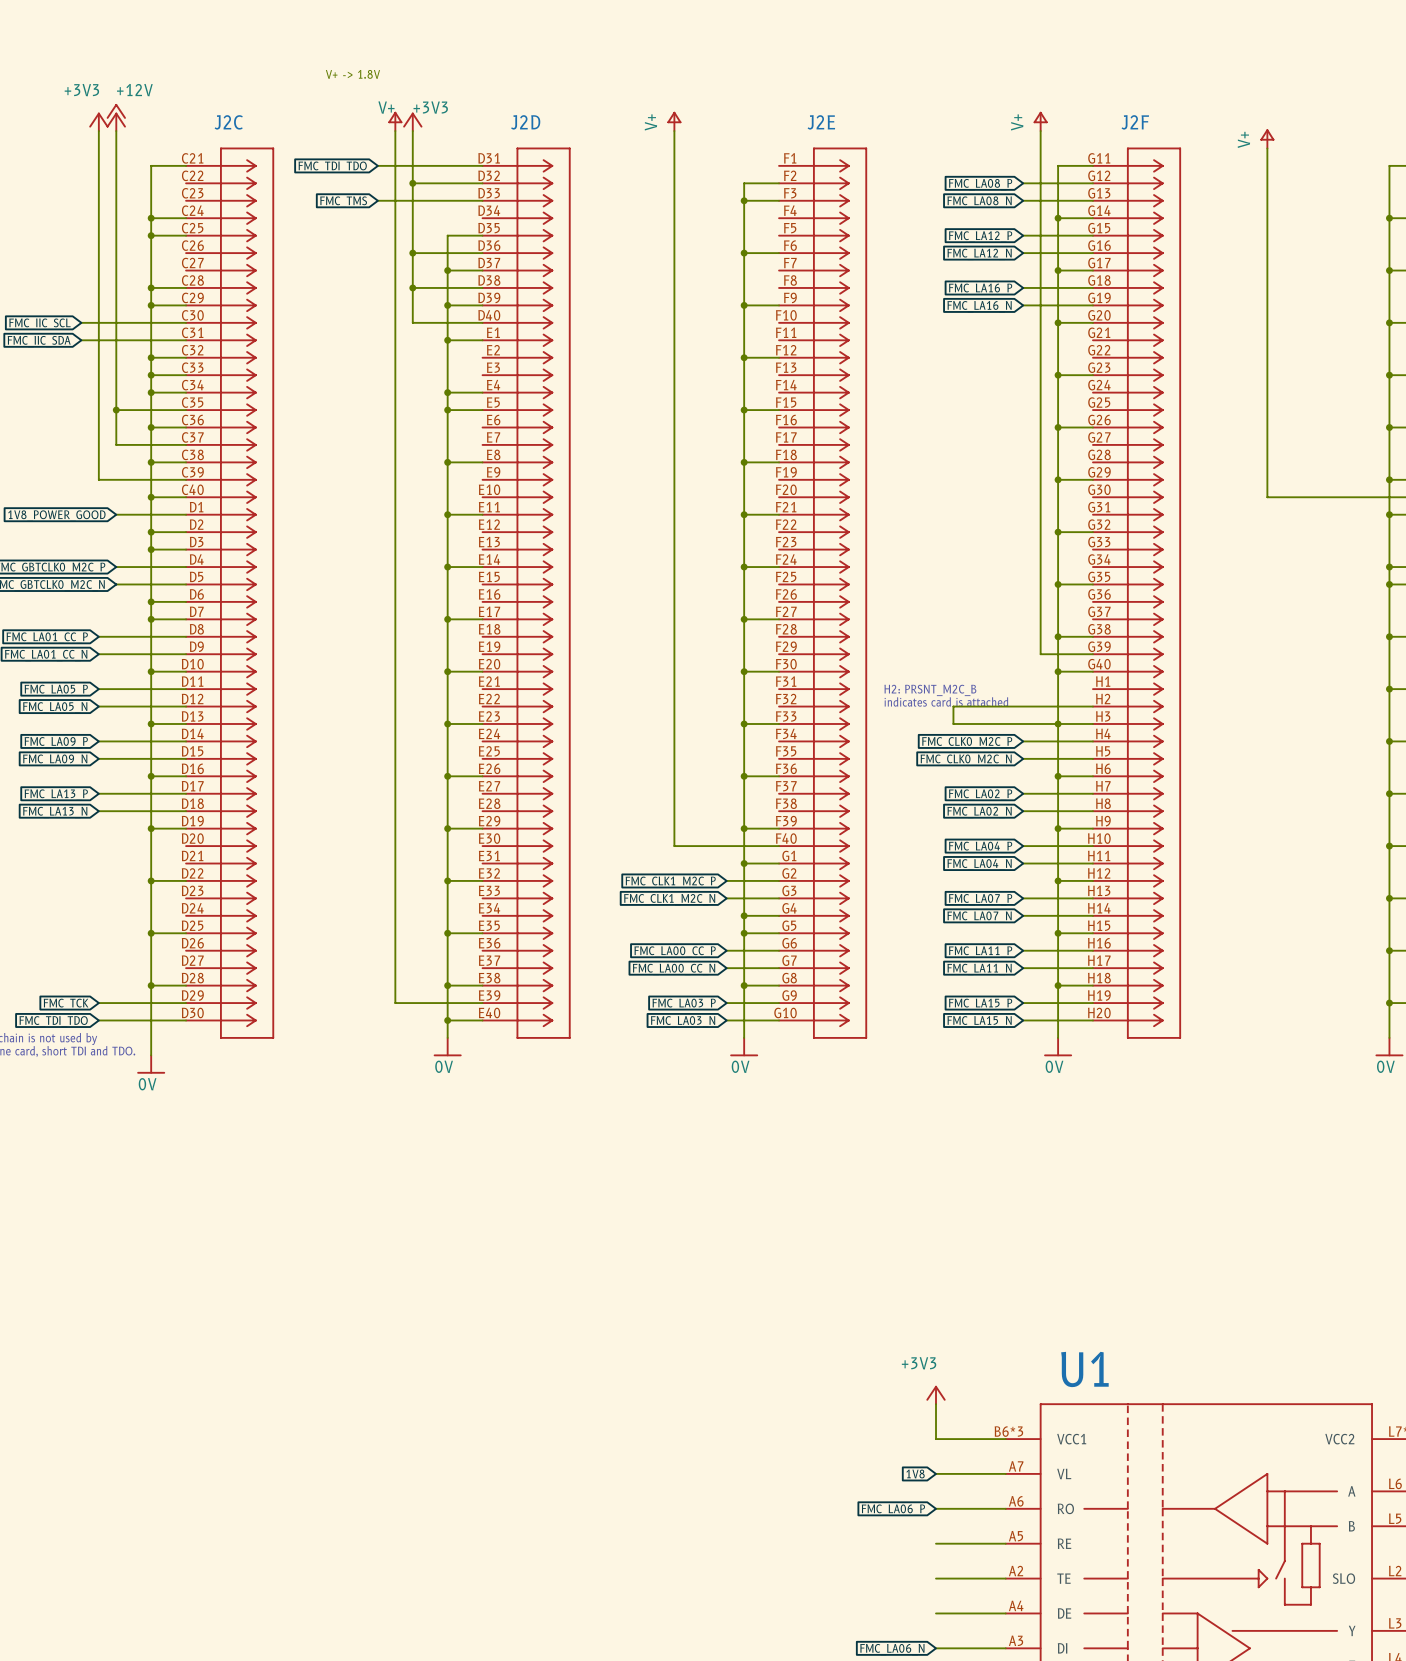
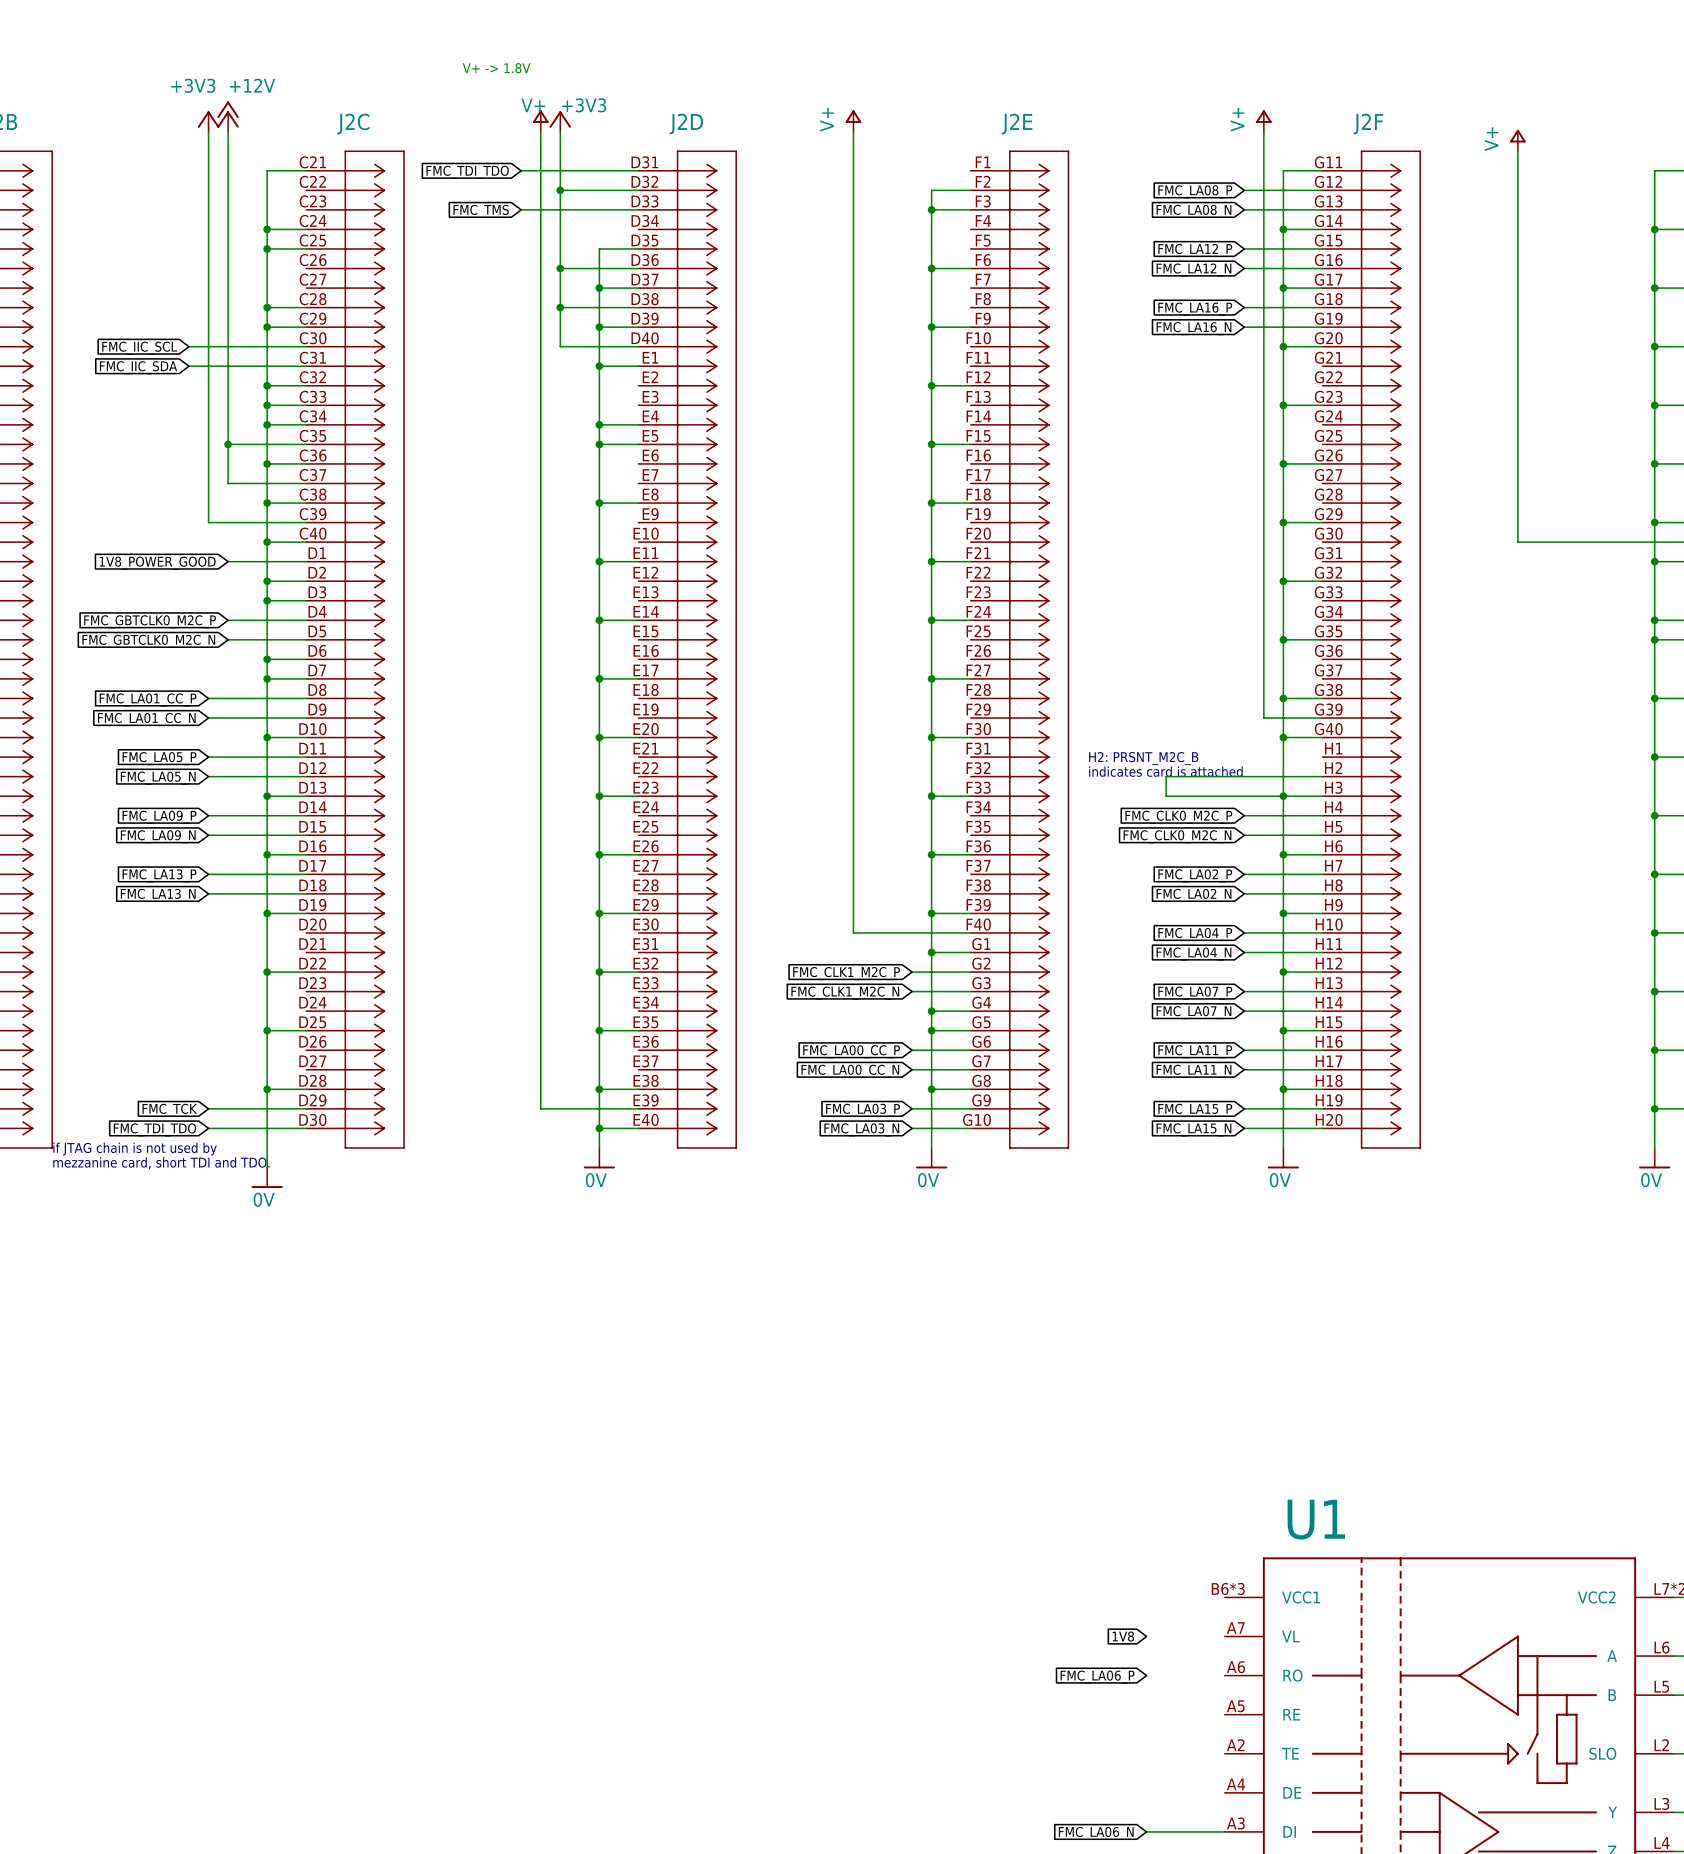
power symbol: +3V3 (936, 1395) -> none
wire: (936, 1404) (936, 1439) (1005, 1439) -> none
wire: (936, 1473) (1005, 1473) -> none
wire: (936, 1508) (1005, 1508) -> none
wire: (936, 1543) (1005, 1543) -> none
wire: (936, 1578) (1005, 1578) -> none
wire: (936, 1613) (1005, 1613) -> none

